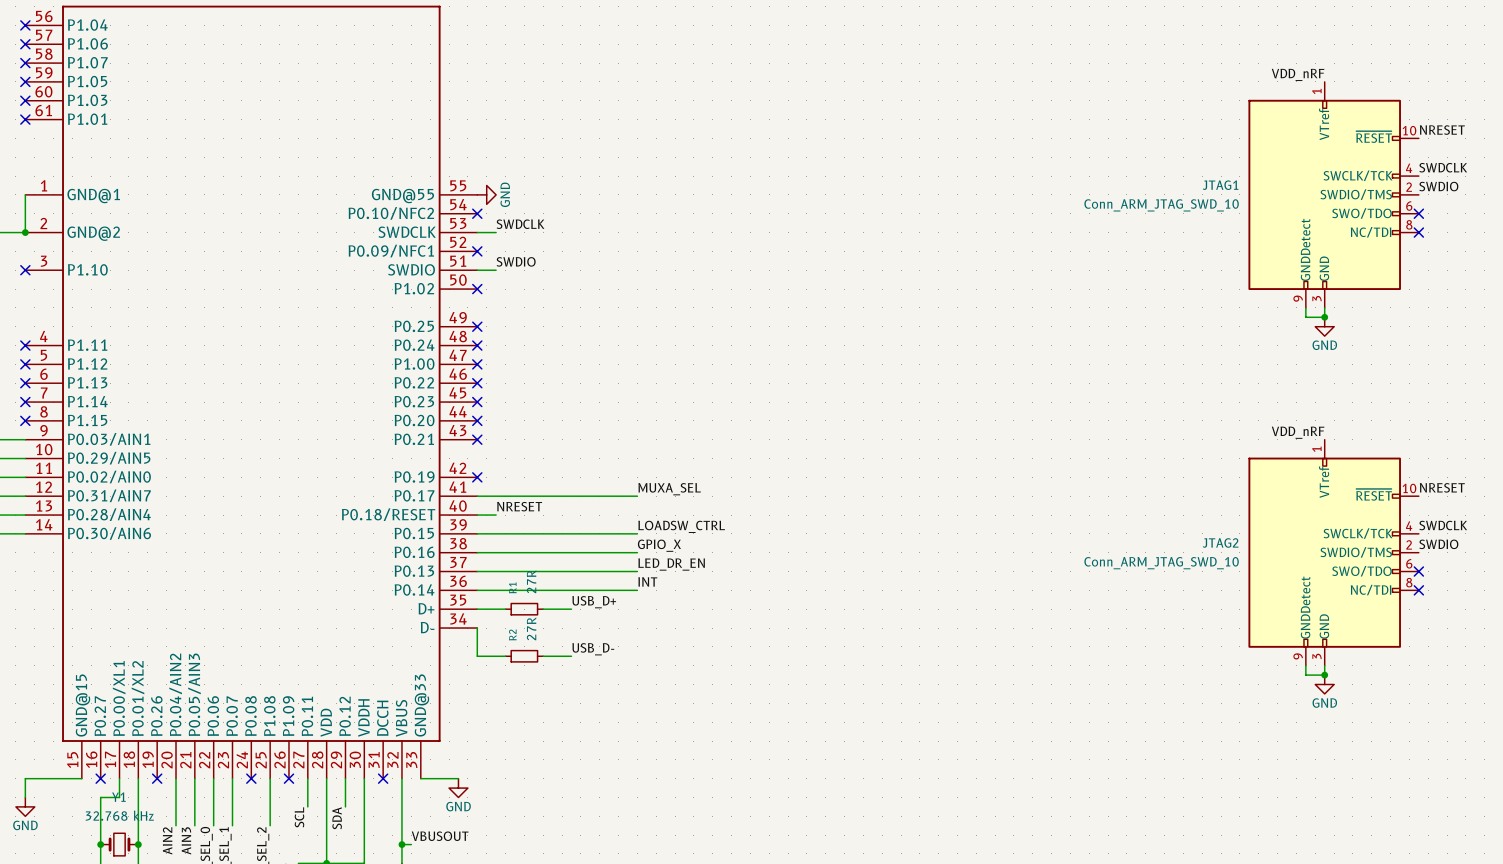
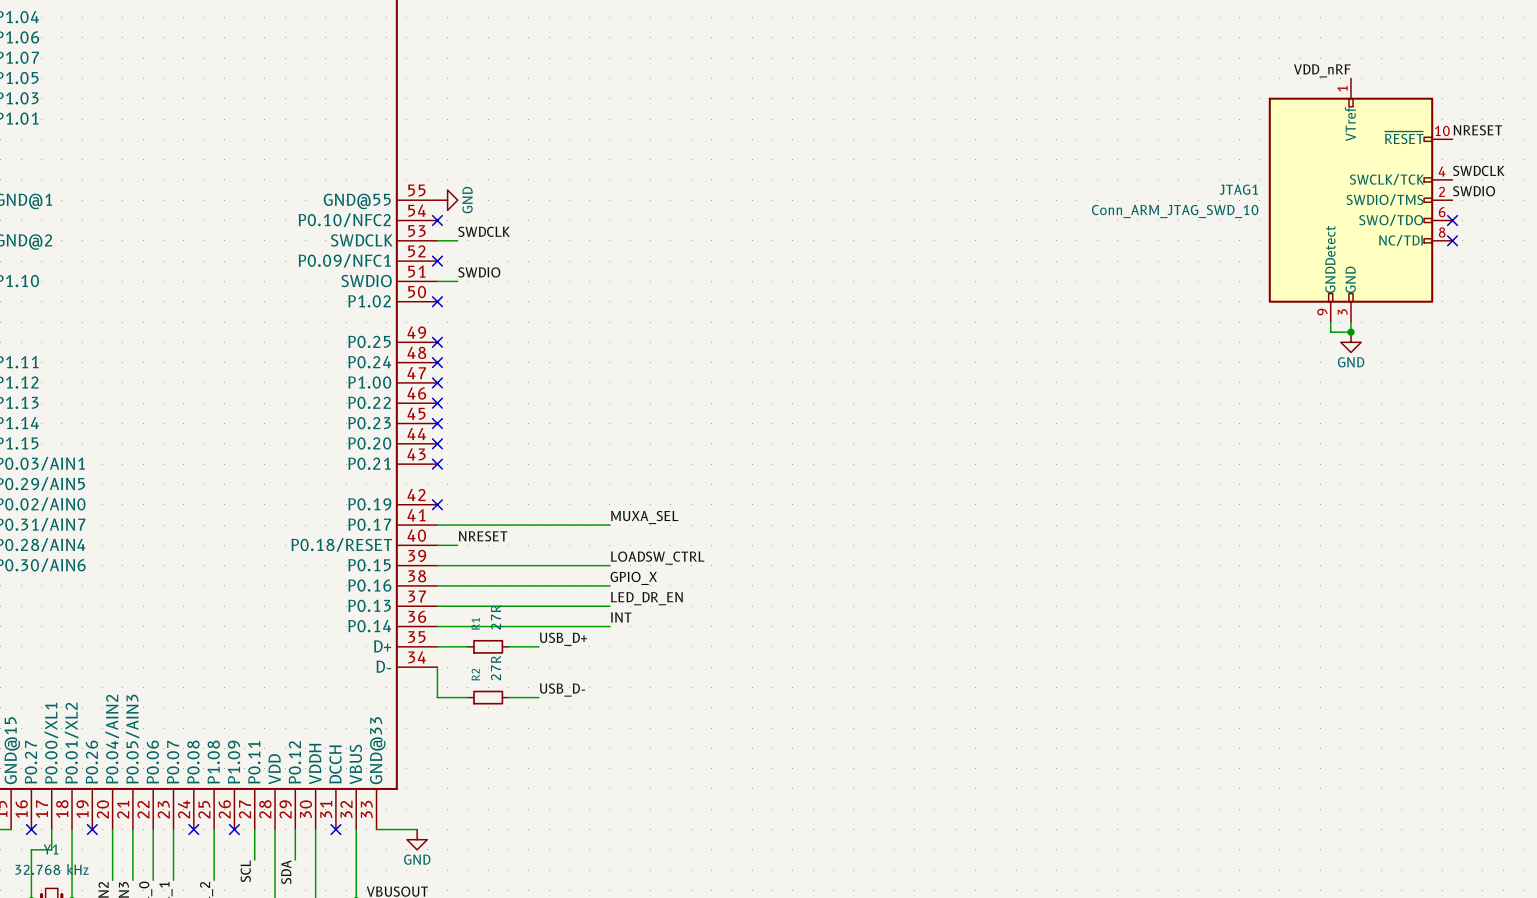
label: VDD_nRF (1298, 432) -> none
label: NRESET (1442, 487) -> none
label: SWDCLK (1443, 525) -> none
label: SWDIO (1438, 544) -> none
JTAG2: Conn_ARM_JTAG_SWD_10 (1333, 552) -> none
no-connect mark: (1418, 571) -> none
no-connect mark: (1418, 590) -> none
wire: (1305, 665) (1305, 675) (1324, 675) (1324, 665) -> none
junction: (1324, 675) -> none
power symbol: GND (1324, 684) -> none

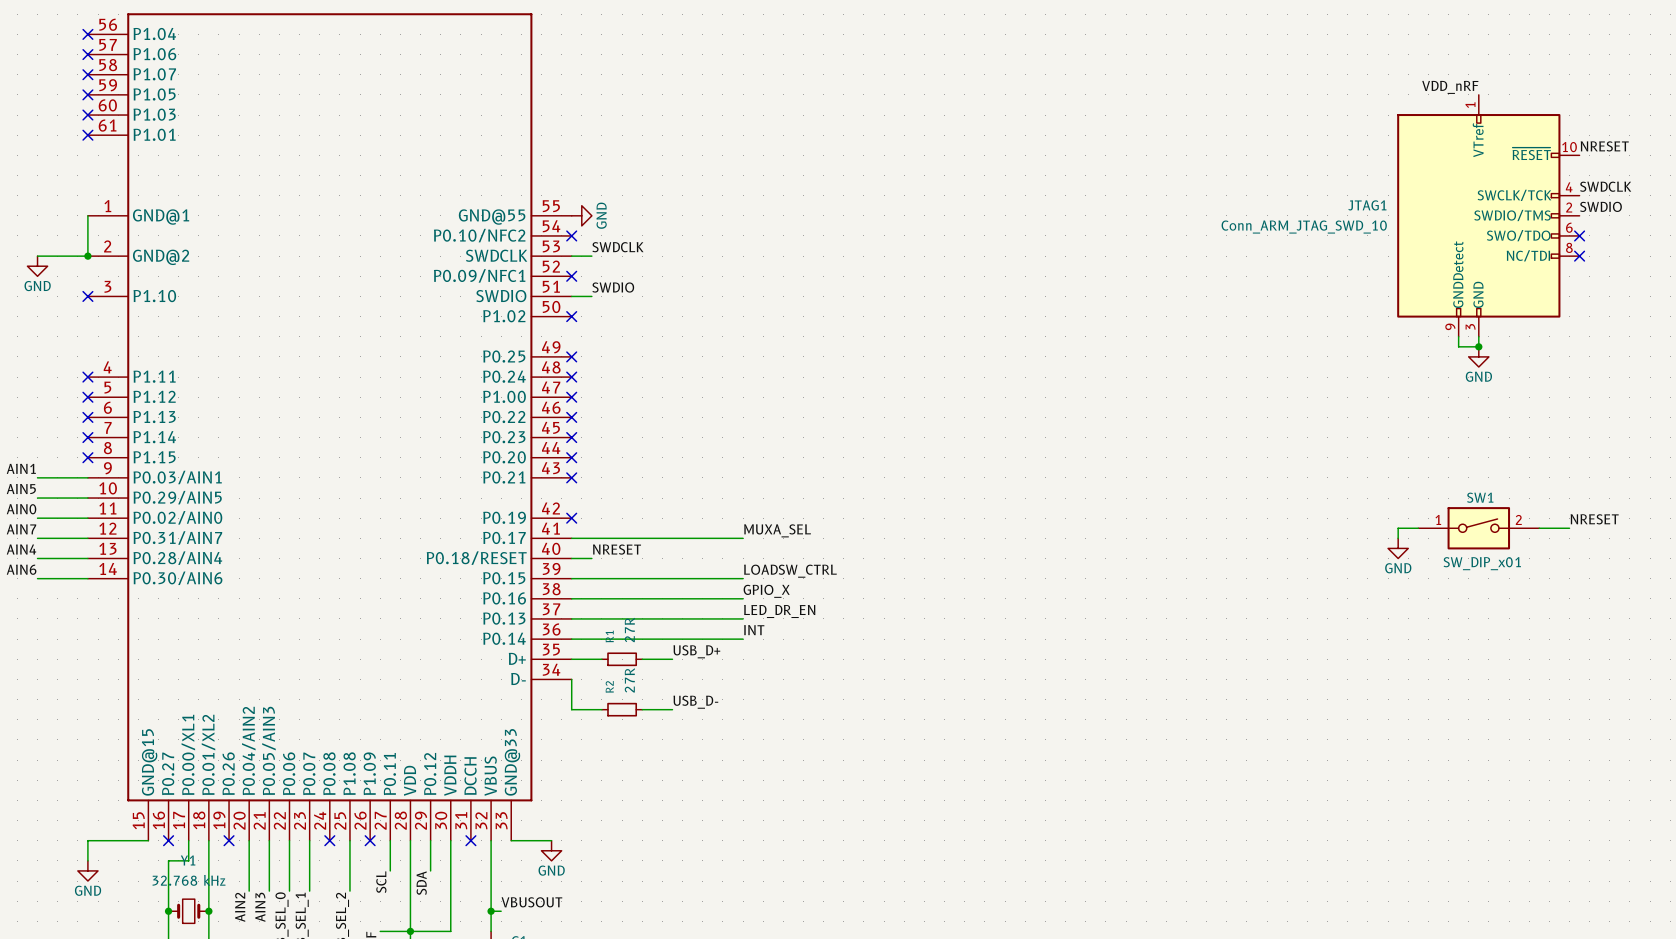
label: none -> NRESET (1594, 519)
wire: none -> (1418, 528) (1398, 528) (1398, 538)
SW1: none -> SW_DIP_x01 (1478, 528)
wire: none -> (1539, 528) (1569, 528)
power symbol: none -> GND (1398, 548)

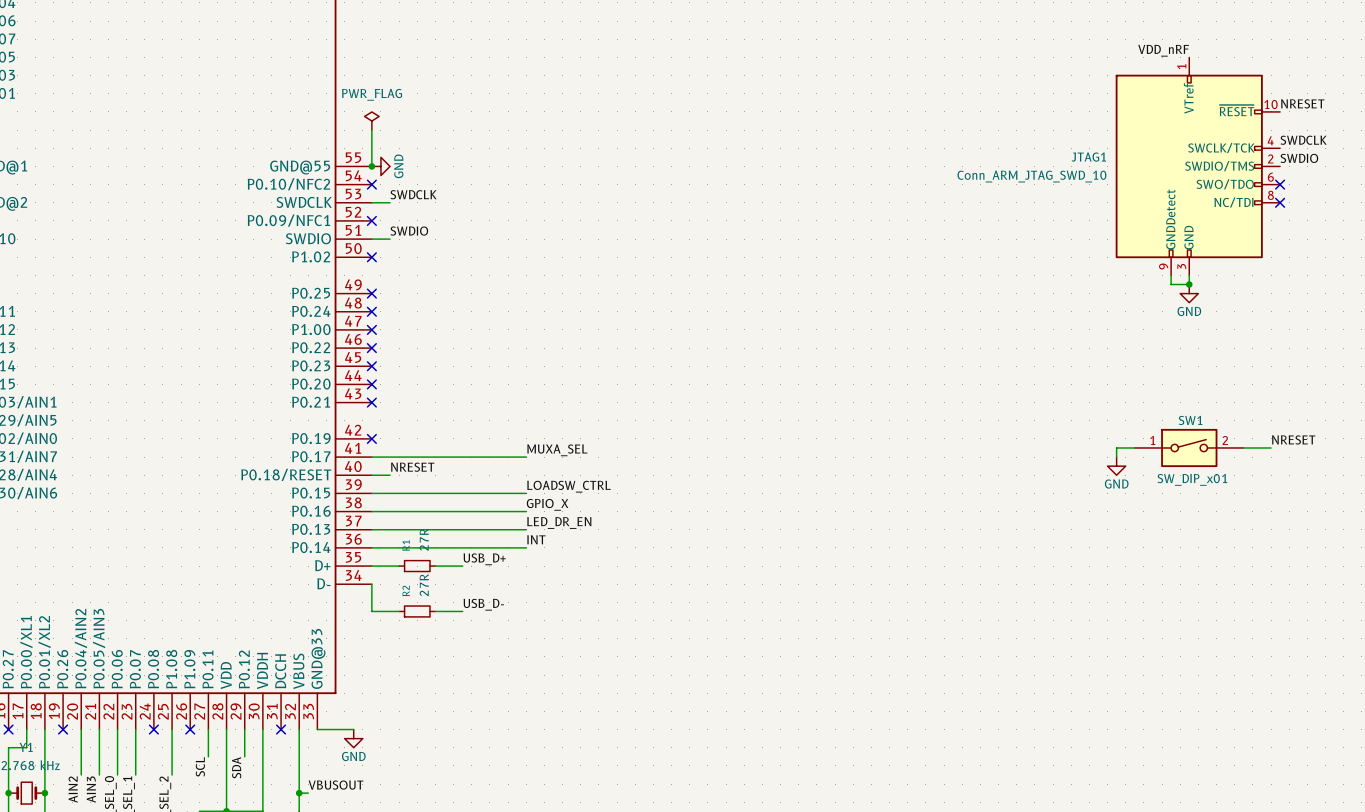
power symbol: none -> PWR_FLAG (371, 121)
wire: none -> (371, 130) (371, 166)
junction: none -> (371, 166)

